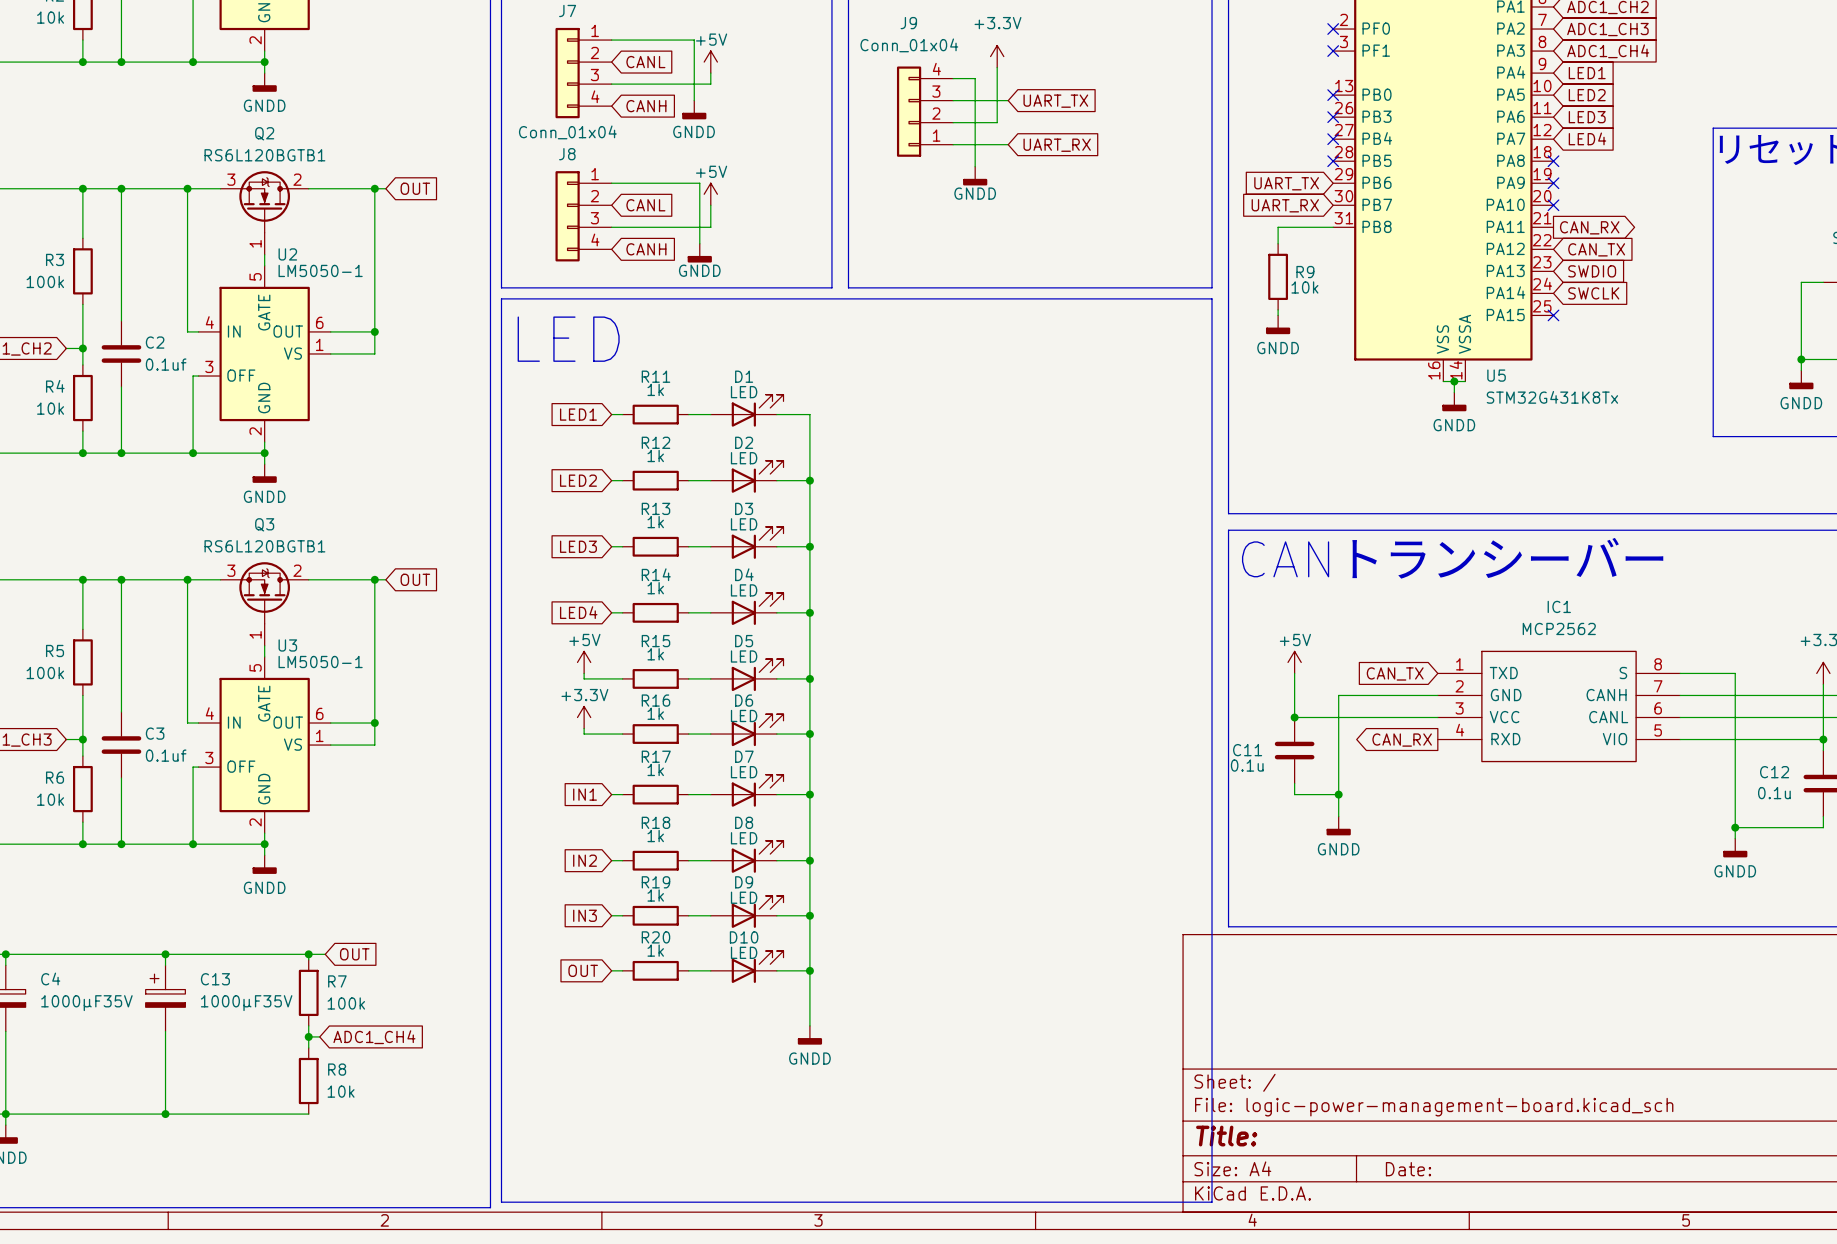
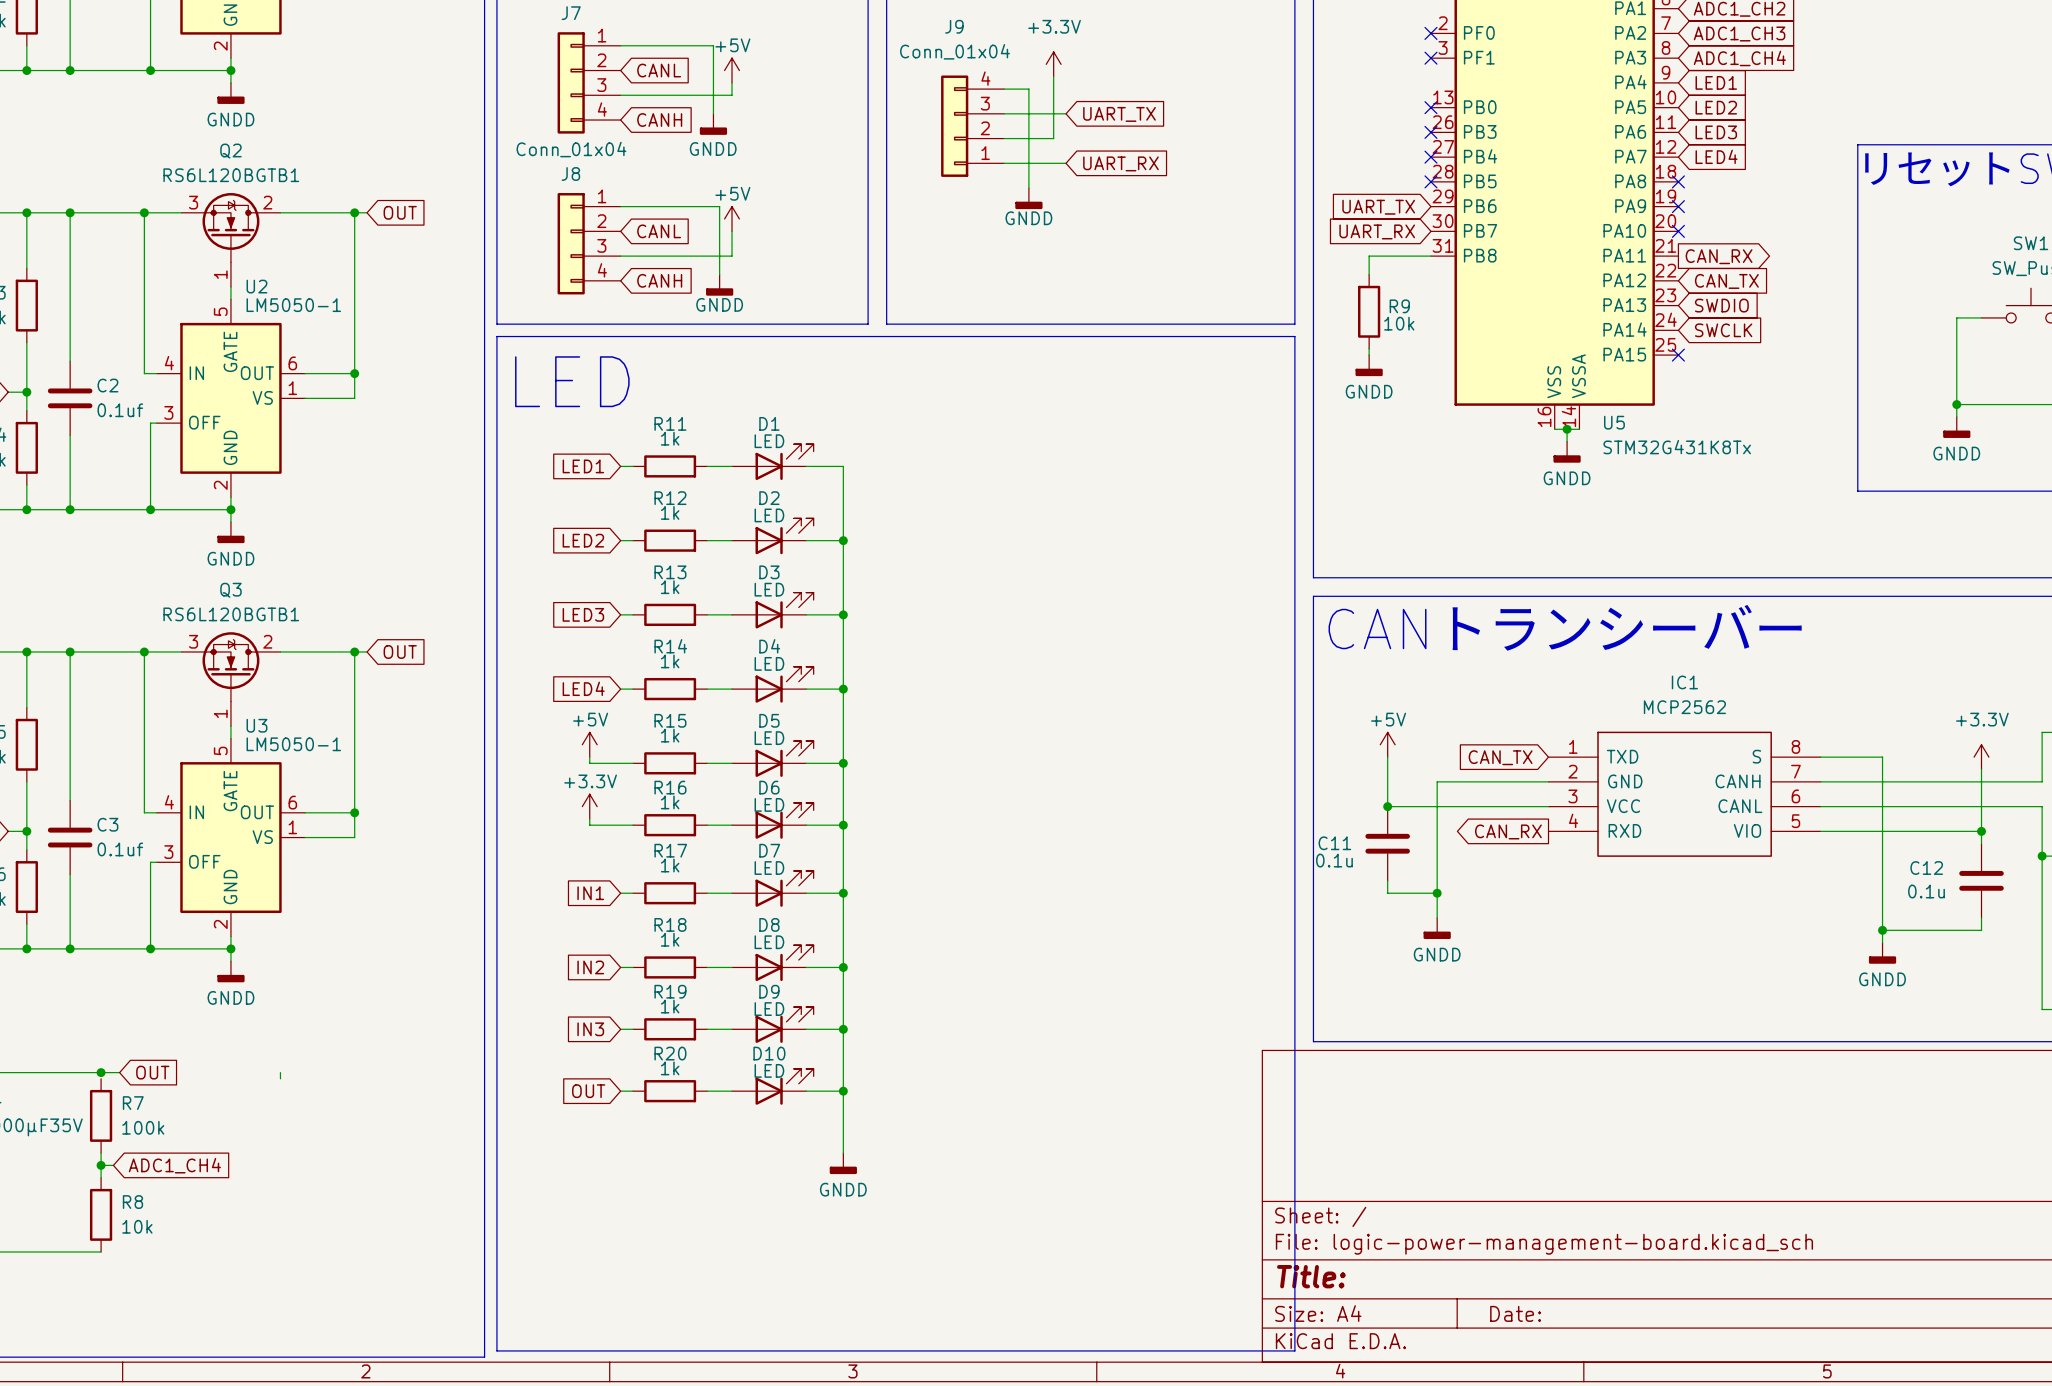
junction position: (165, 954) -> (101, 1072)
junction: (308, 954) -> none
wire: (325, 954) (165, 954) (165, 965) -> none
global label position: OUT (354, 954) -> OUT (152, 1072)
R7 position: (308, 992) -> (101, 1115)
C13: 1000μF35V (165, 998) -> none
wire: (308, 1025) (308, 1047) -> (101, 1153) (101, 1177)
wire: (165, 1031) (165, 1114) -> none
junction: none -> (101, 1165)
wire: (308, 1036) (319, 1036) -> (101, 1165) (113, 1165)
junction: (308, 1036) -> none
global label position: ADC1_CH4 (374, 1037) -> ADC1_CH4 (174, 1165)
R8 position: (308, 1081) -> (101, 1214)
wire: (148, 1114) (308, 1114) -> none
junction: (165, 1114) -> none

